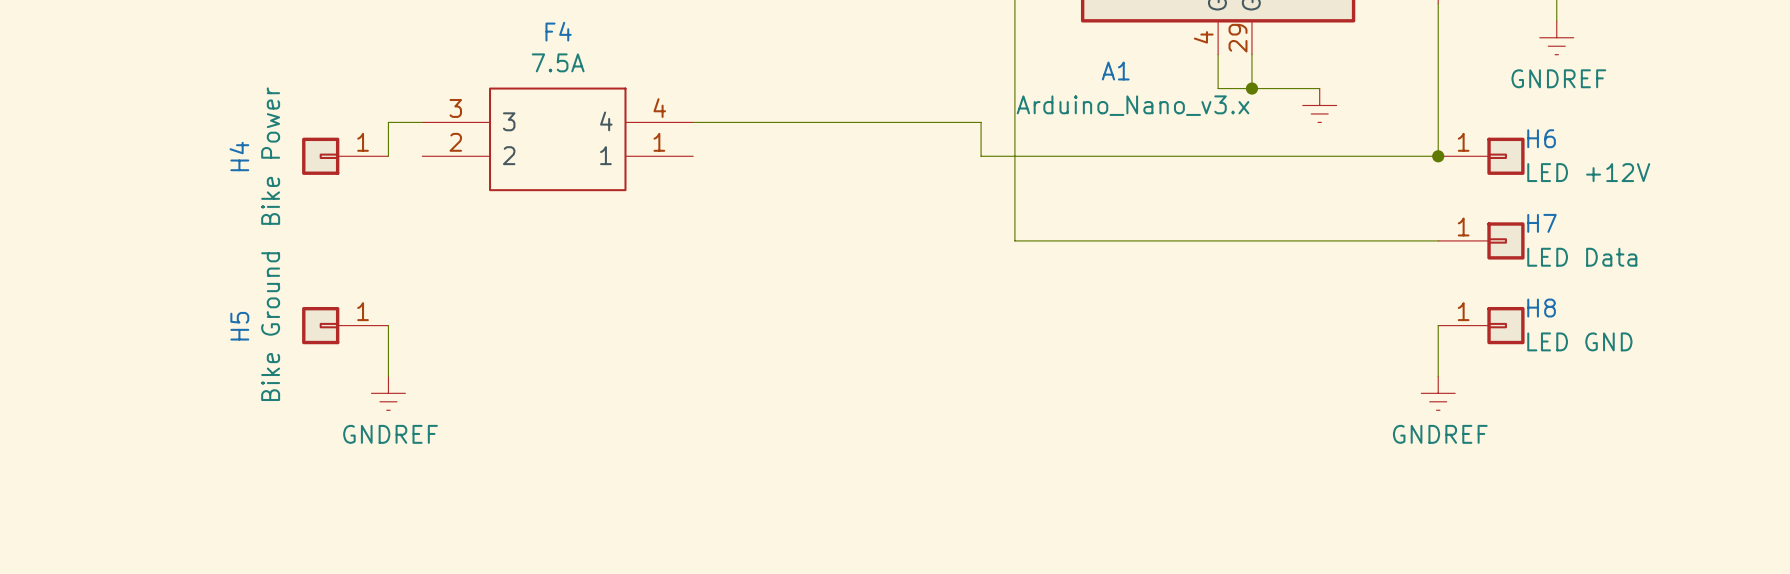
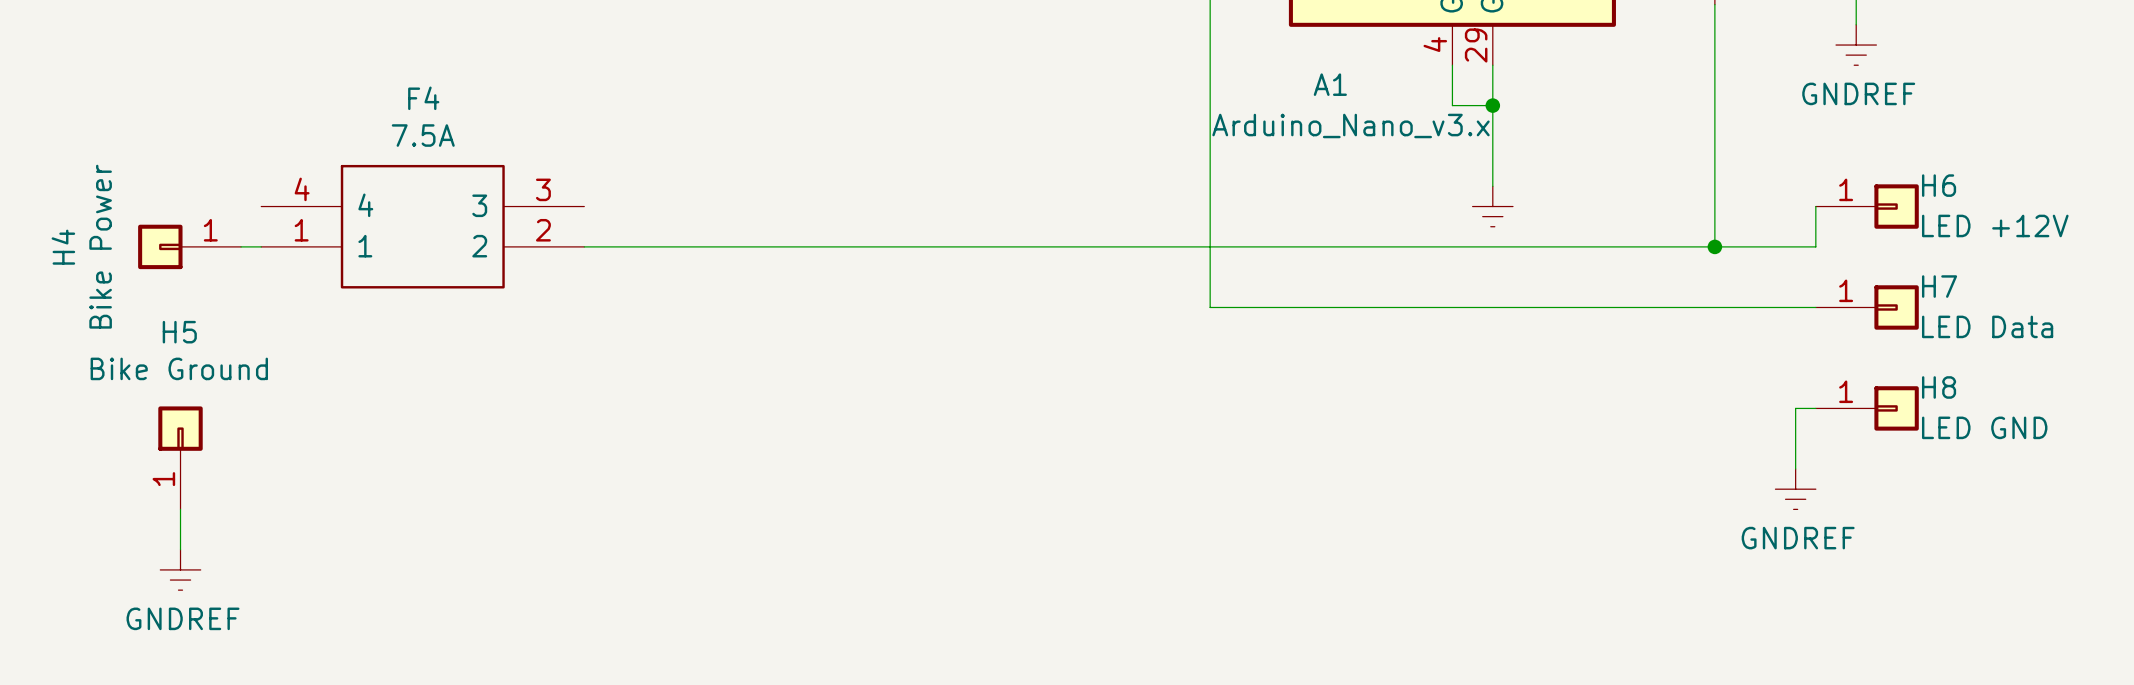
wire: (1251, 88) (1319, 88) -> (1492, 105) (1492, 186)
power symbol position: (1319, 105) -> (1492, 206)
wire: (422, 122) (388, 122) (388, 156) -> none
wire: (693, 122) (981, 122) (981, 156) (1438, 156) -> (1714, 246) (1714, 186)
F4 flip: as is (557, 139) -> left-right (422, 226)
F4 position: (557, 139) -> (422, 226)
H4 position: (345, 156) -> (189, 246)
junction position: (1438, 156) -> (1714, 246)
H6 position: (1481, 156) -> (1867, 206)
wire: none -> (1815, 206) (1815, 246) (584, 246)
wire: none -> (241, 246) (261, 246)
wire: (1014, 240) (1438, 240) -> (1210, 287) (1210, 307) (1815, 307)
H7 position: (1481, 240) -> (1867, 307)
H5 rotation: 0° (320, 325) -> 90° clockwise (180, 428)
H5 position: (345, 325) -> (180, 457)
wire: (388, 325) (388, 376) -> none
wire: (1438, 325) (1438, 376) -> none
H8 position: (1481, 325) -> (1867, 408)
wire: none -> (1815, 408) (1795, 408) (1795, 469)
power symbol position: GNDREF (388, 393) -> GNDREF (180, 569)
power symbol position: GNDREF (1438, 393) -> GNDREF (1795, 489)
wire: none -> (180, 509) (180, 549)

